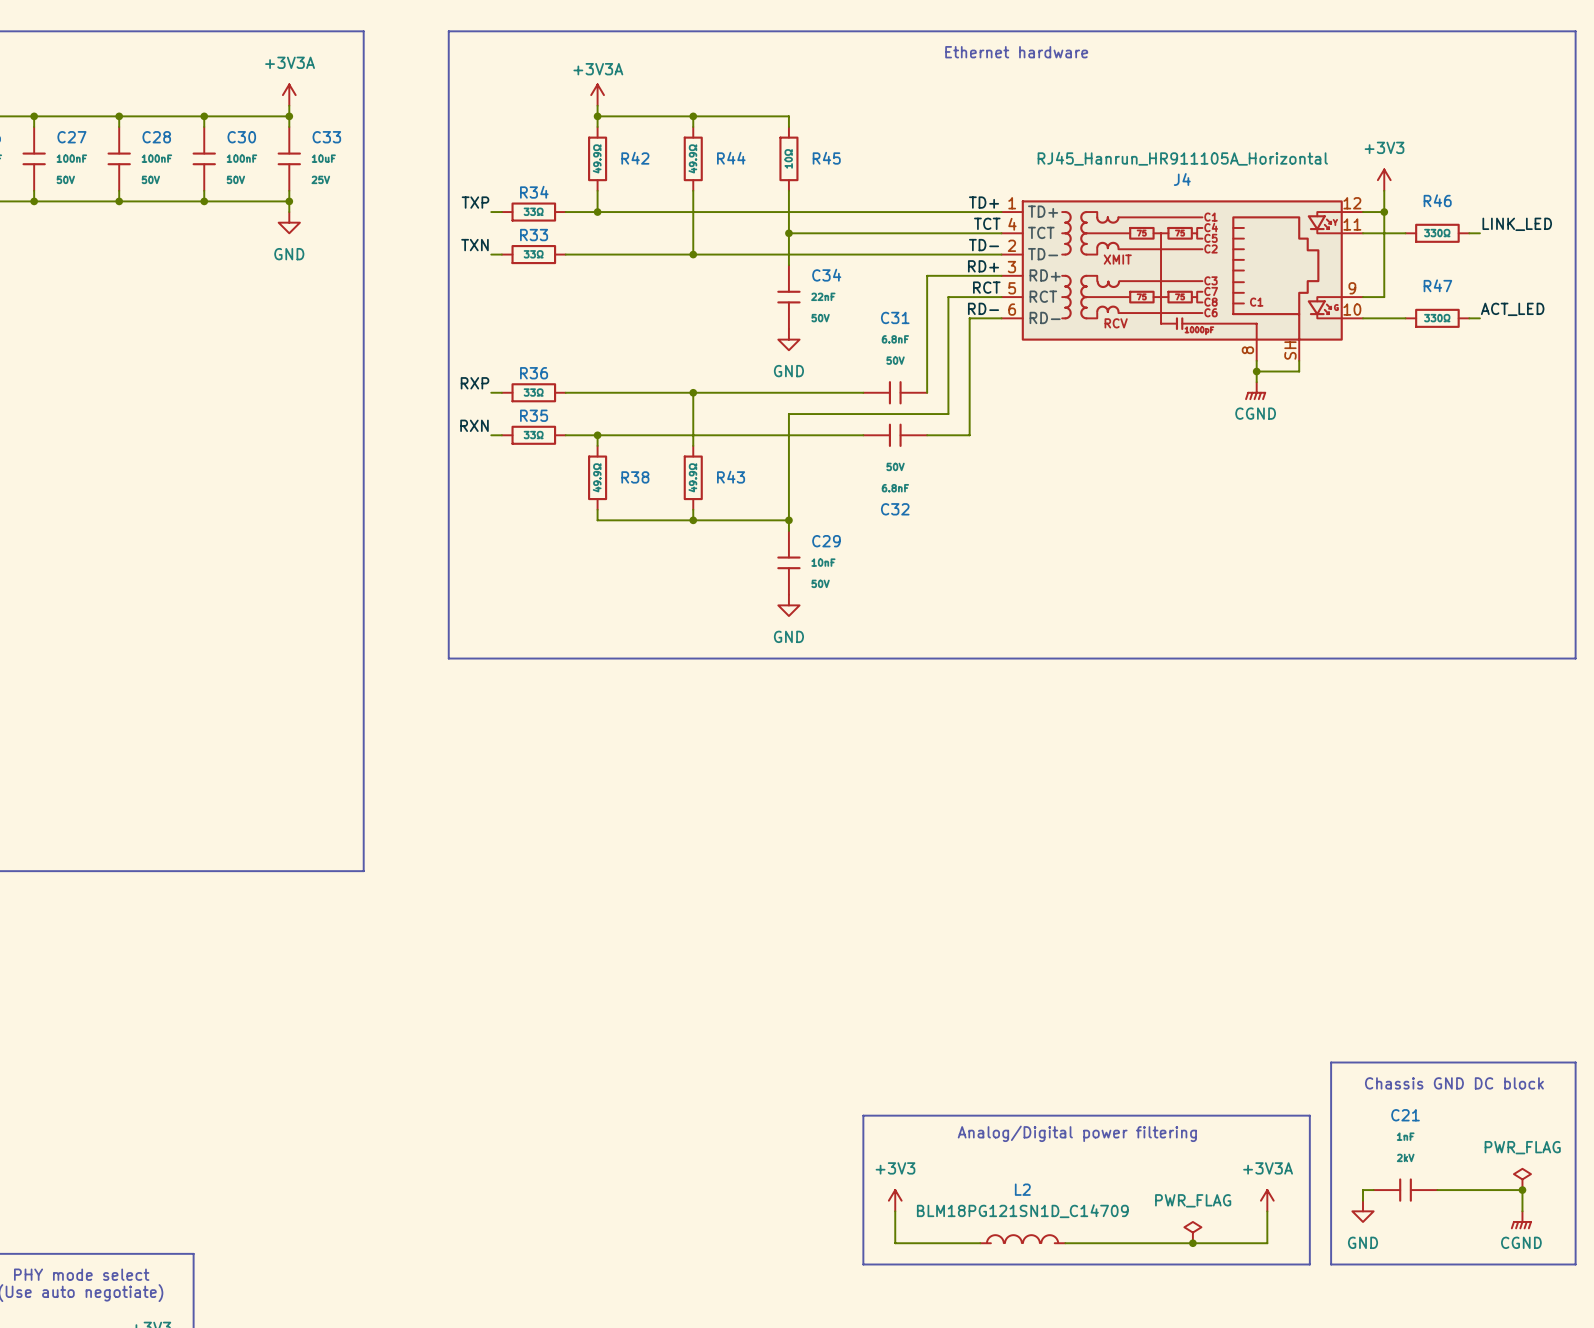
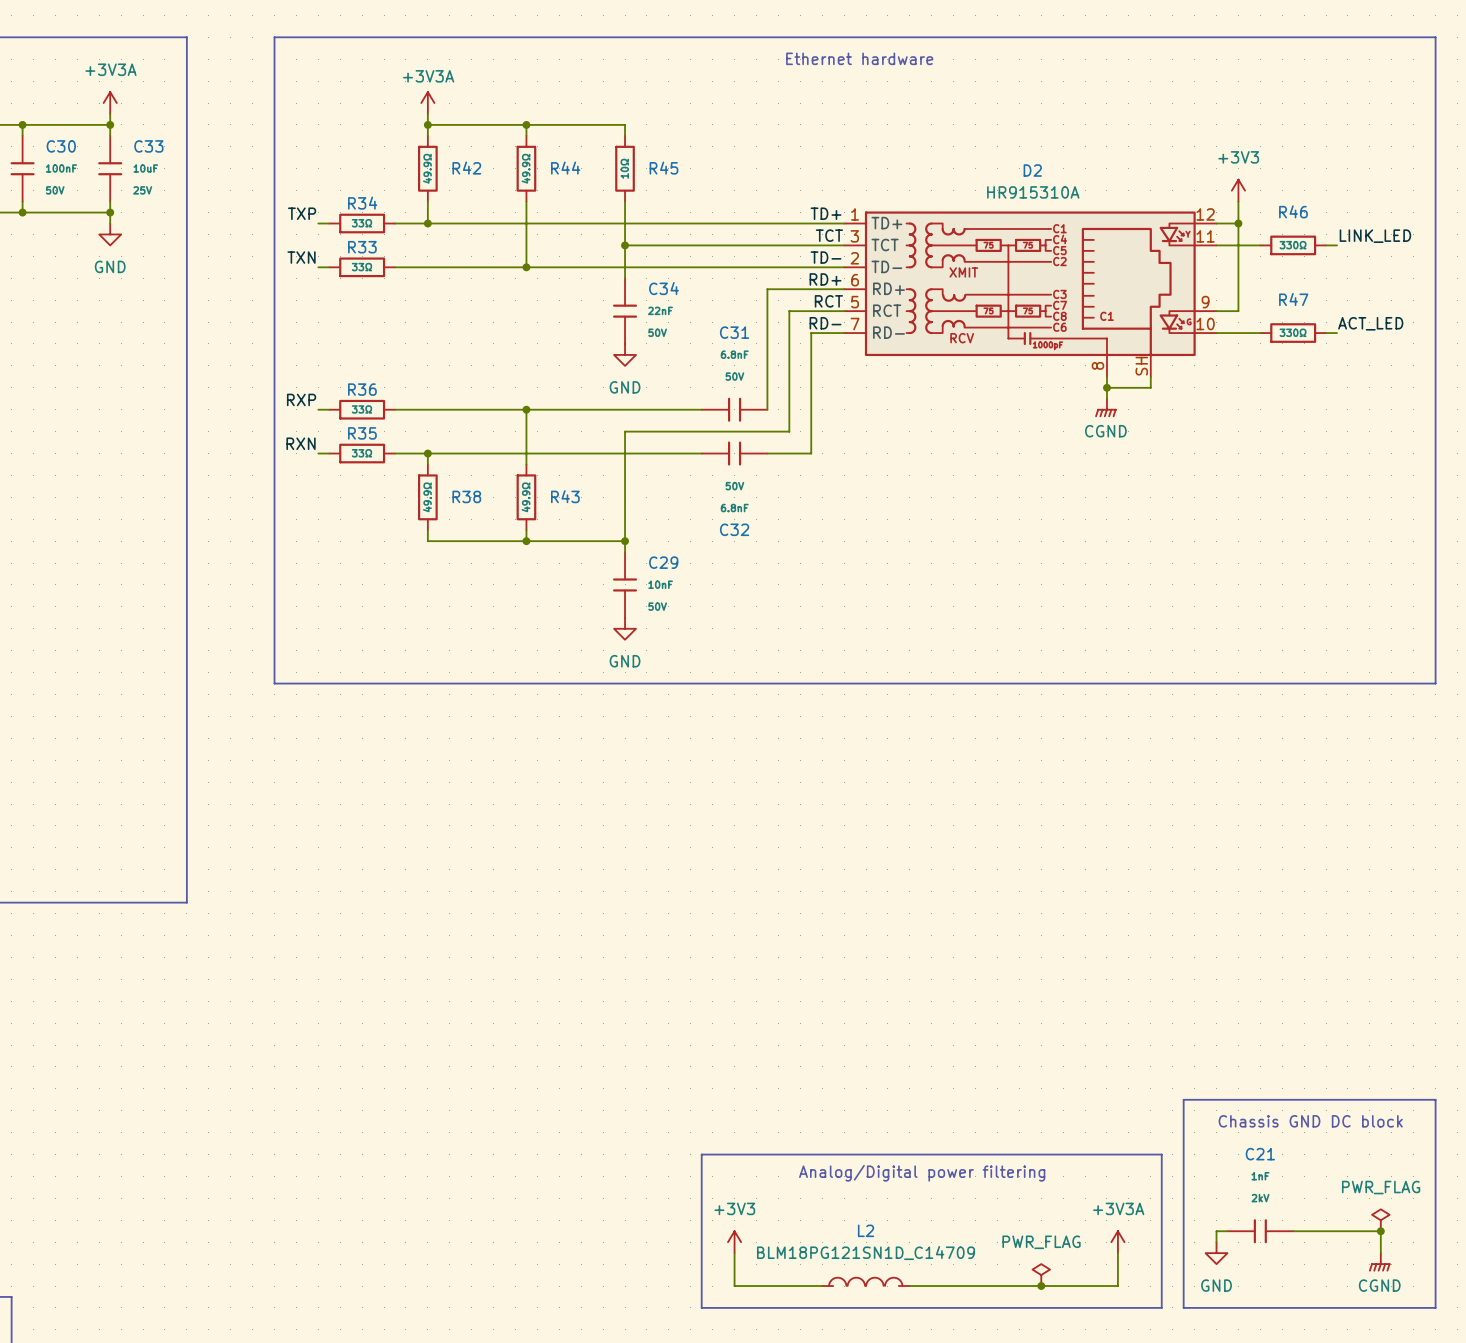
J4 value: RJ45_Hanrun_HR911105A_Horizontal (1182, 158) -> HR915310A (1033, 192)
J4 name: J4 (1182, 179) -> D2 (1032, 170)
J4 pin number: 4 (1012, 224) -> 3 (854, 236)
J4 pin number: 3 (1011, 267) -> 6 (855, 280)
J4 pin number: 6 (1012, 309) -> 7 (855, 324)

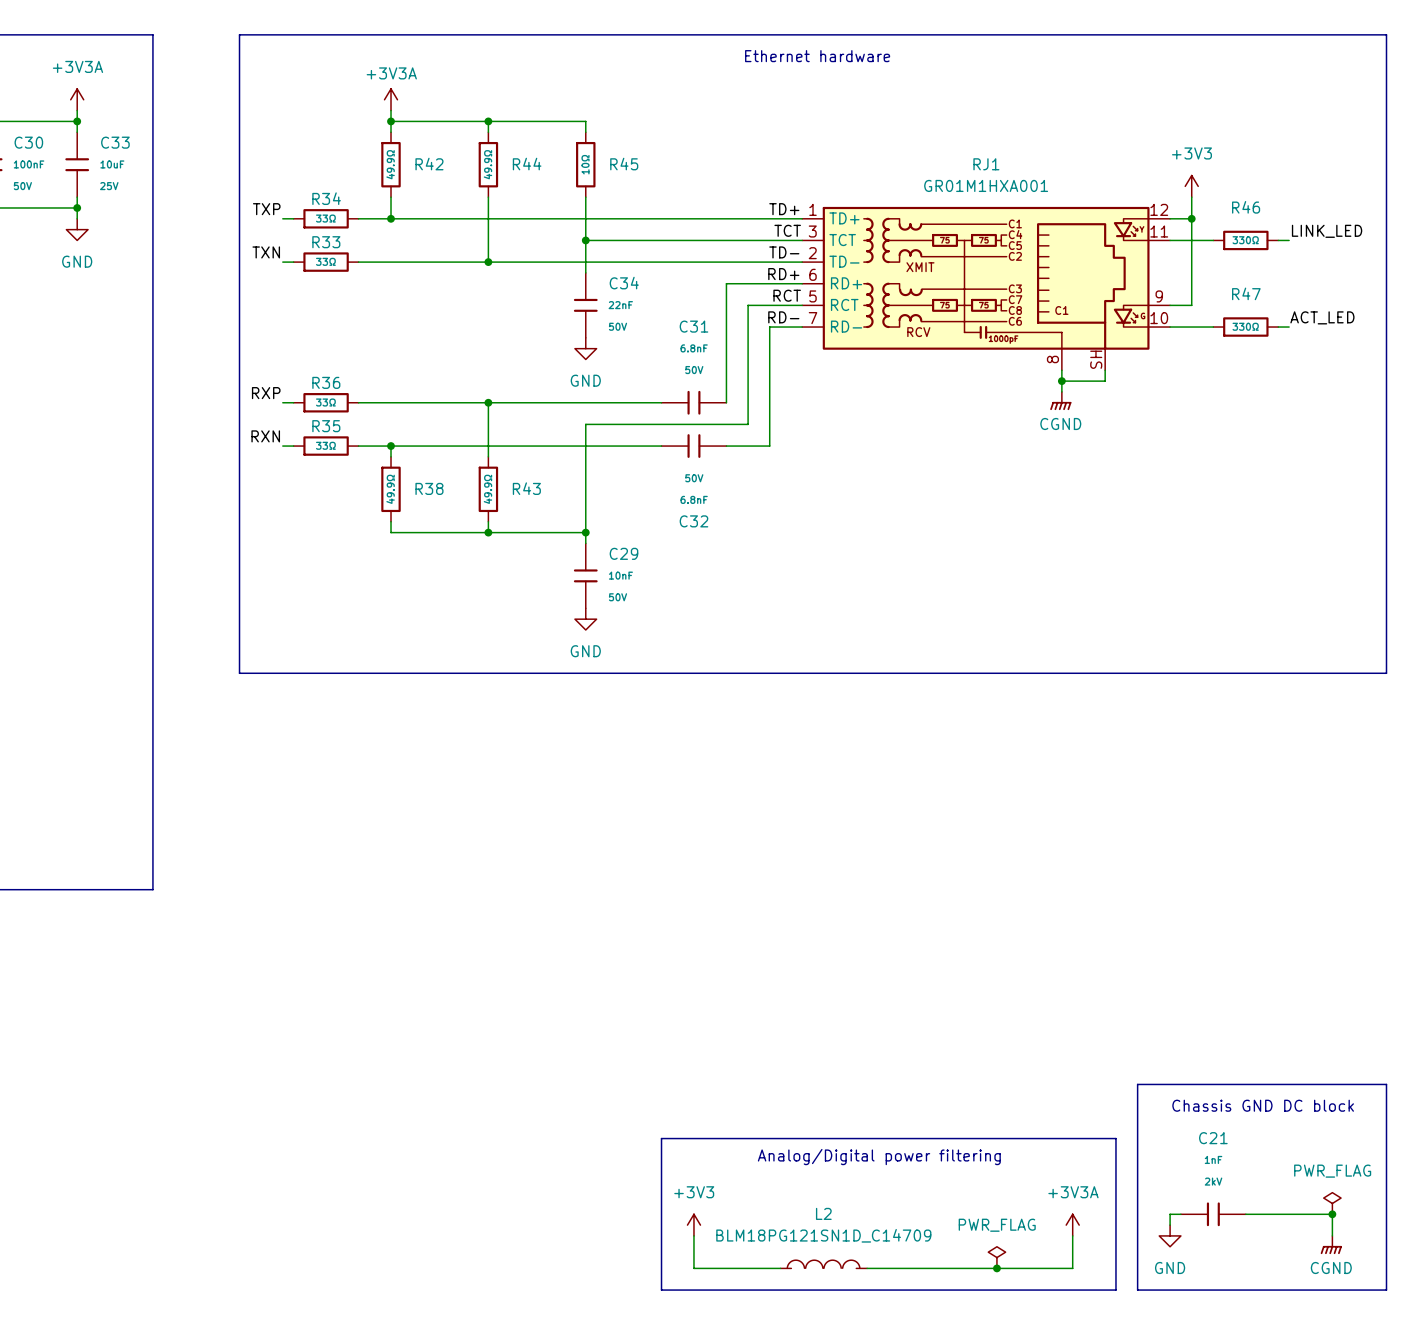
D2 name: D2 (1032, 170) -> RJ1 (986, 164)
D2 value: HR915310A (1033, 192) -> GR01M1HXA001 (986, 185)

